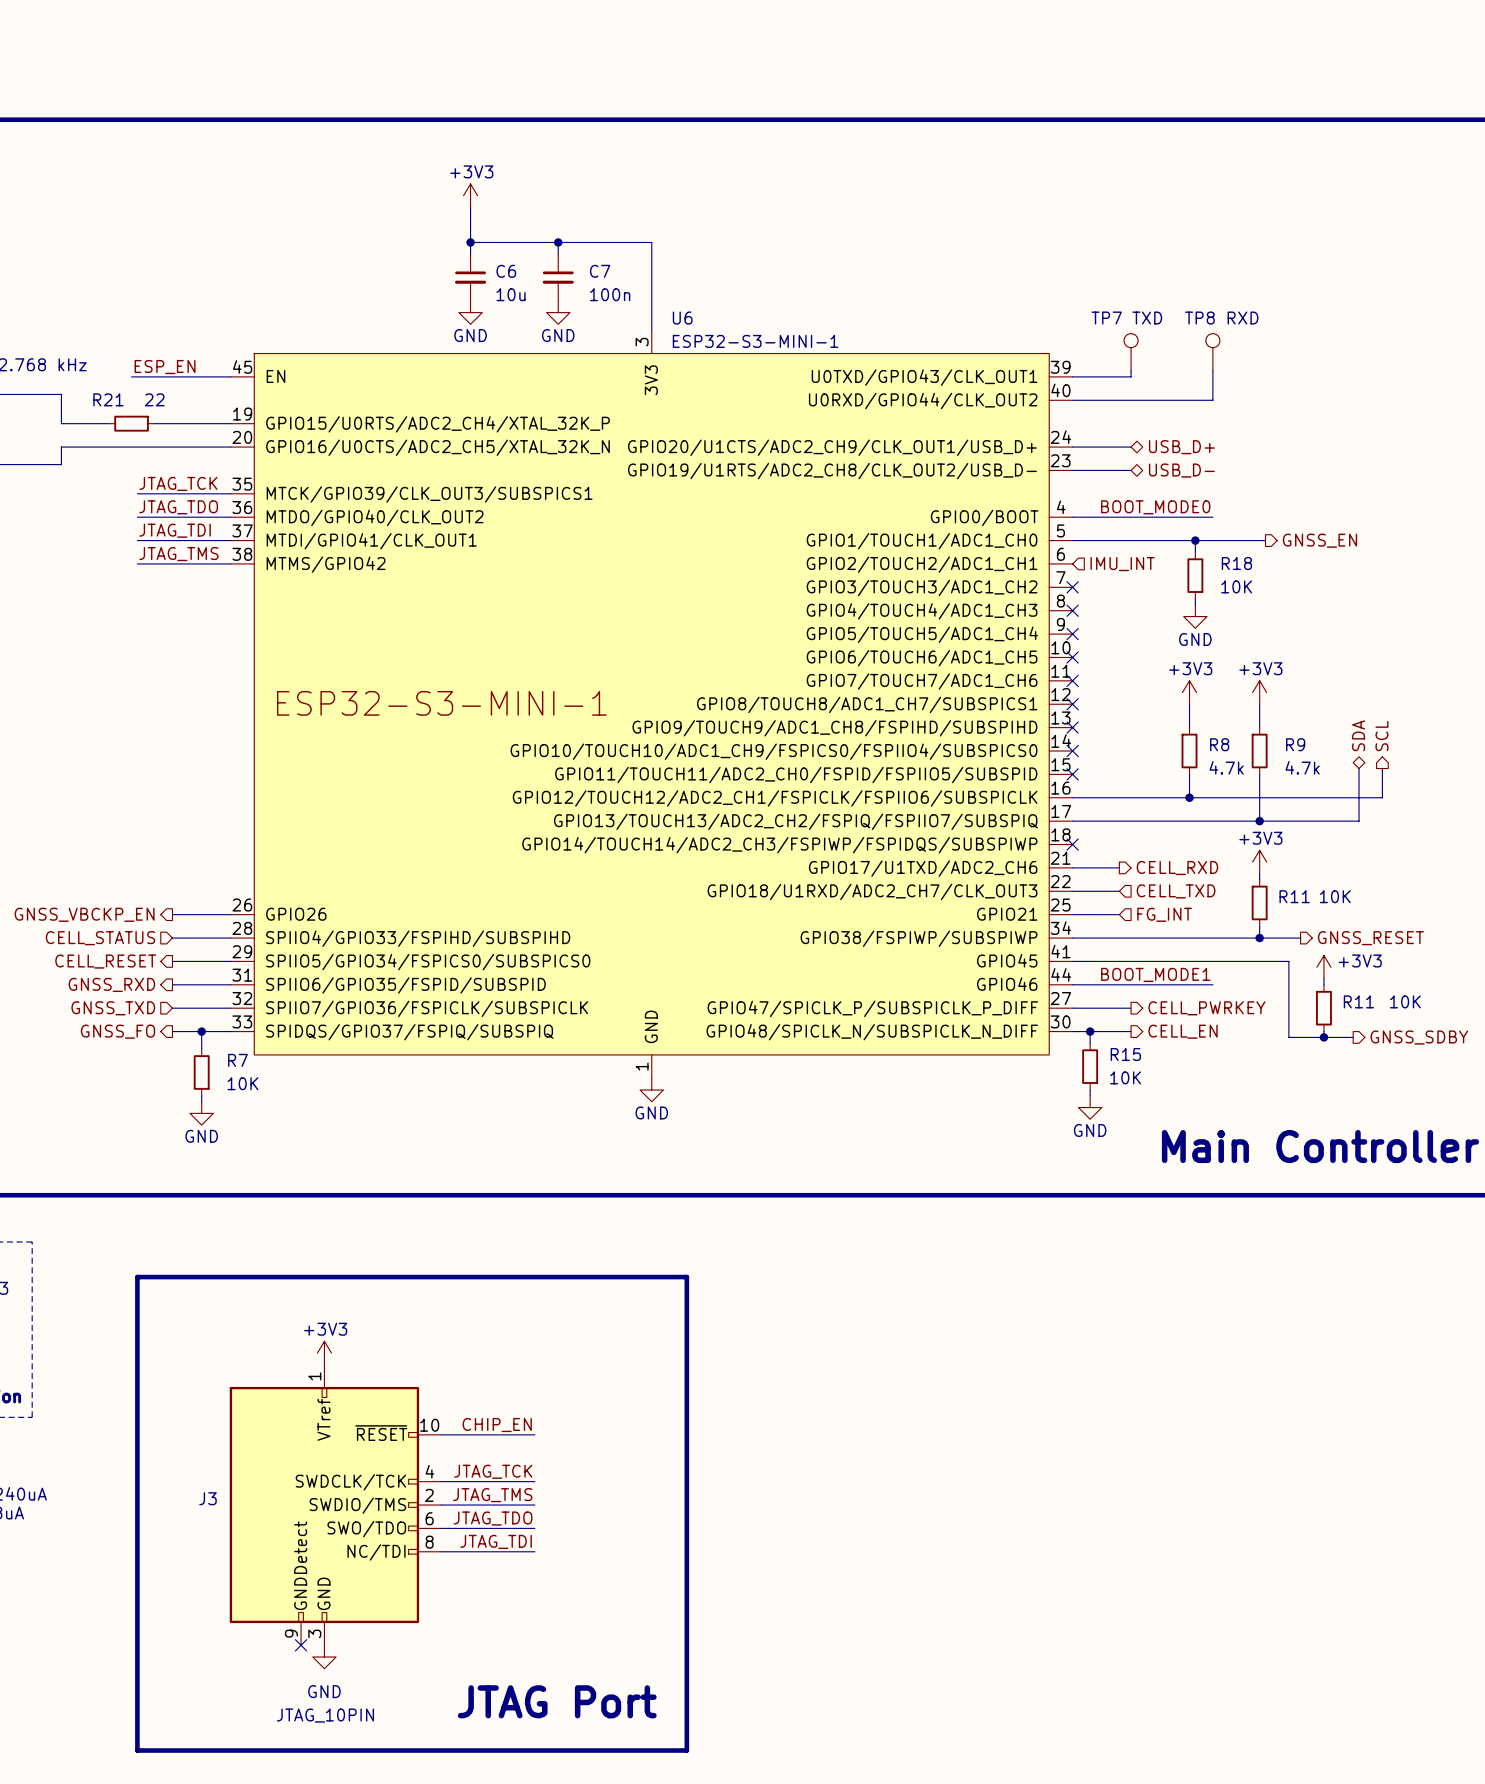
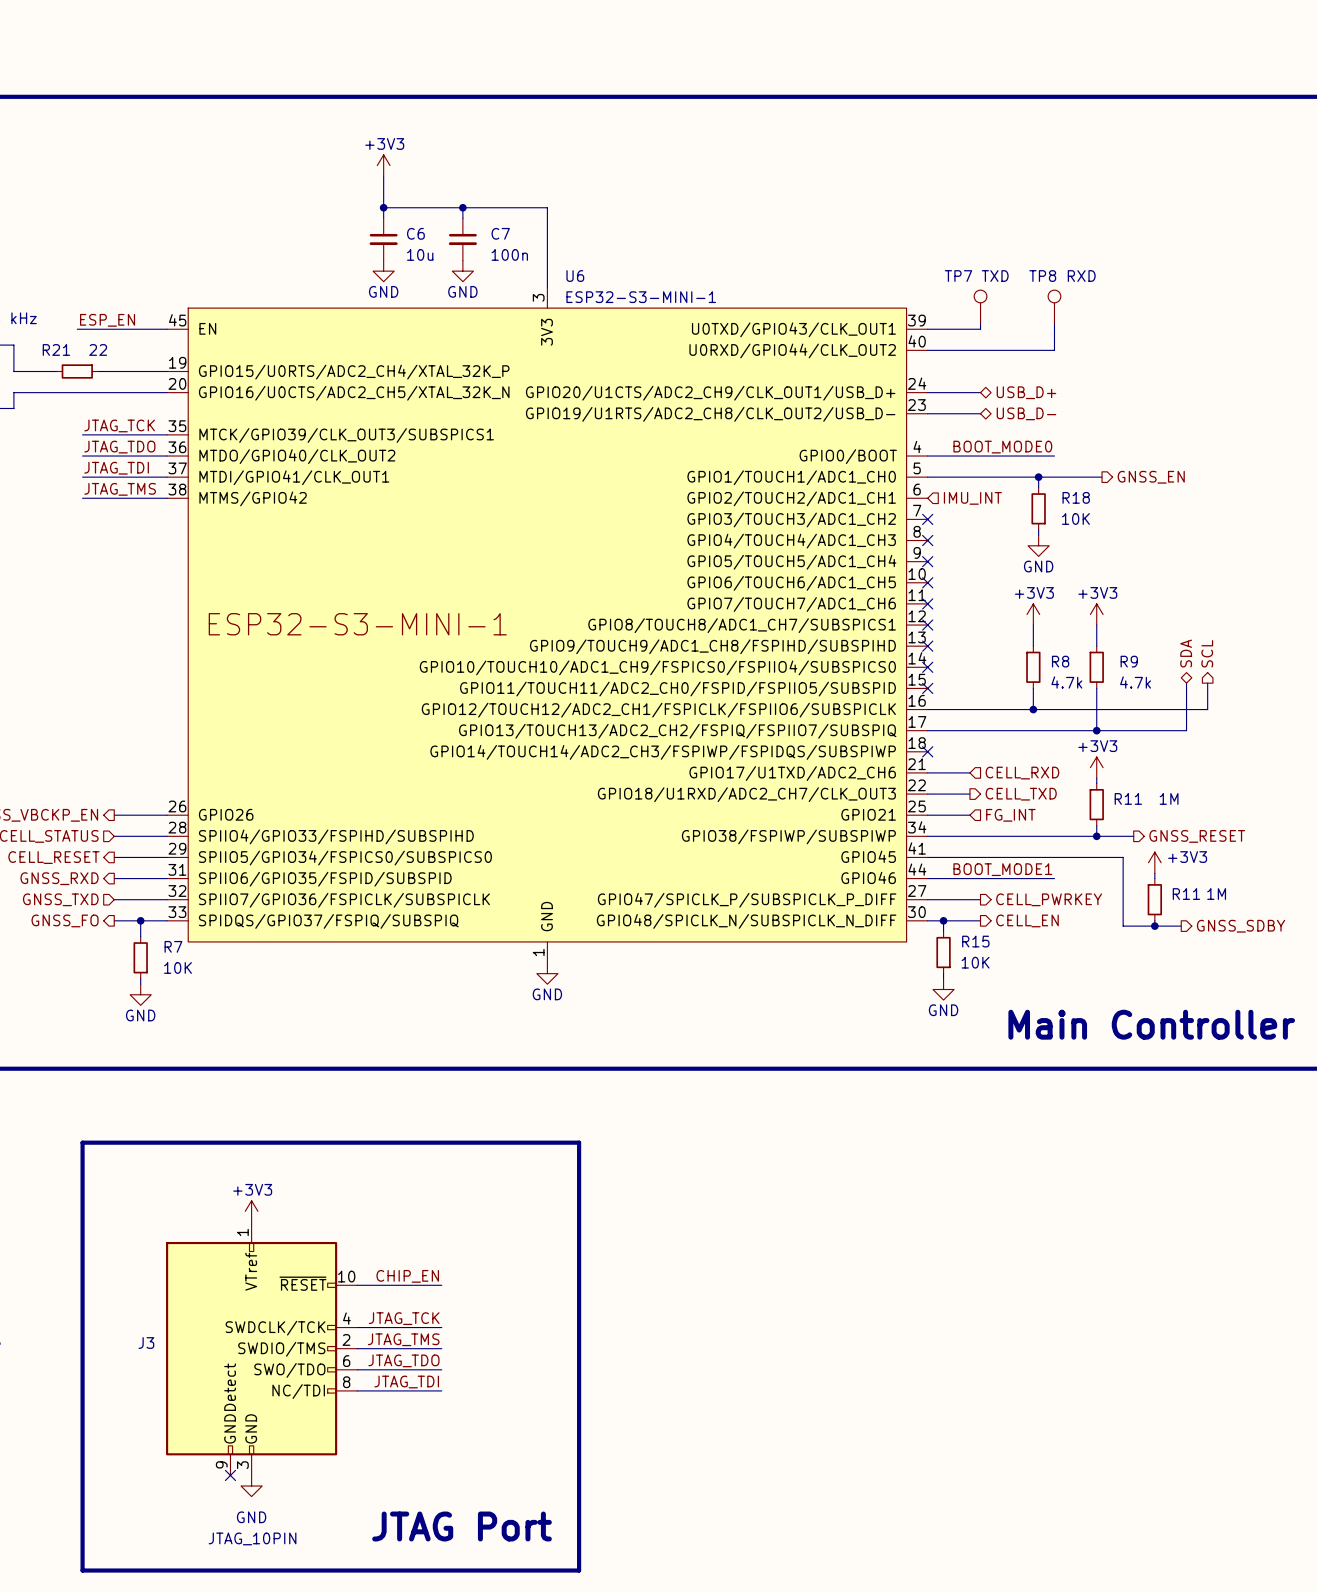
hierarchical label shape: output (1177, 868) -> input (1022, 773)
hierarchical label shape: input (1176, 891) -> output (1021, 794)
R11 value: 10K (1335, 896) -> 1M (1169, 798)
R11 value: 10K (1405, 1001) -> 1M (1216, 894)

